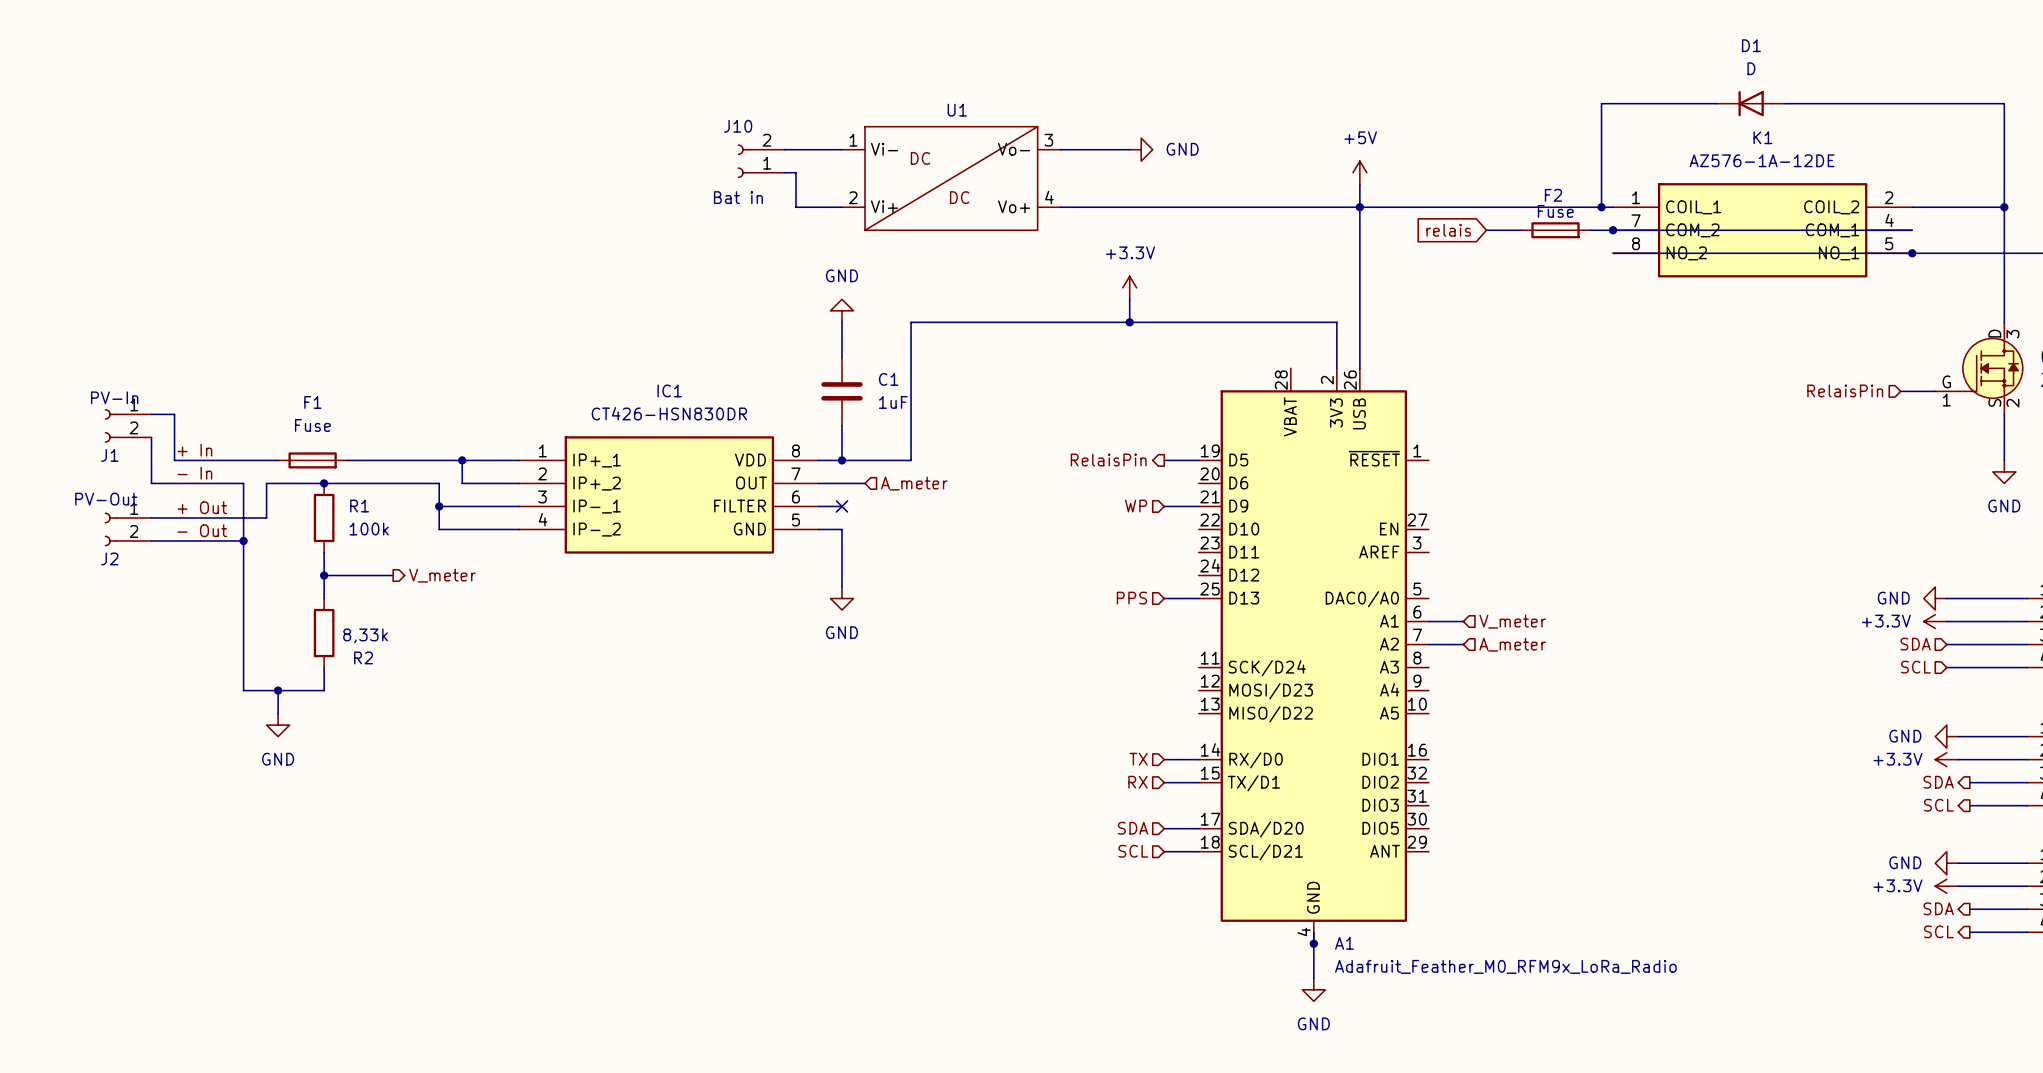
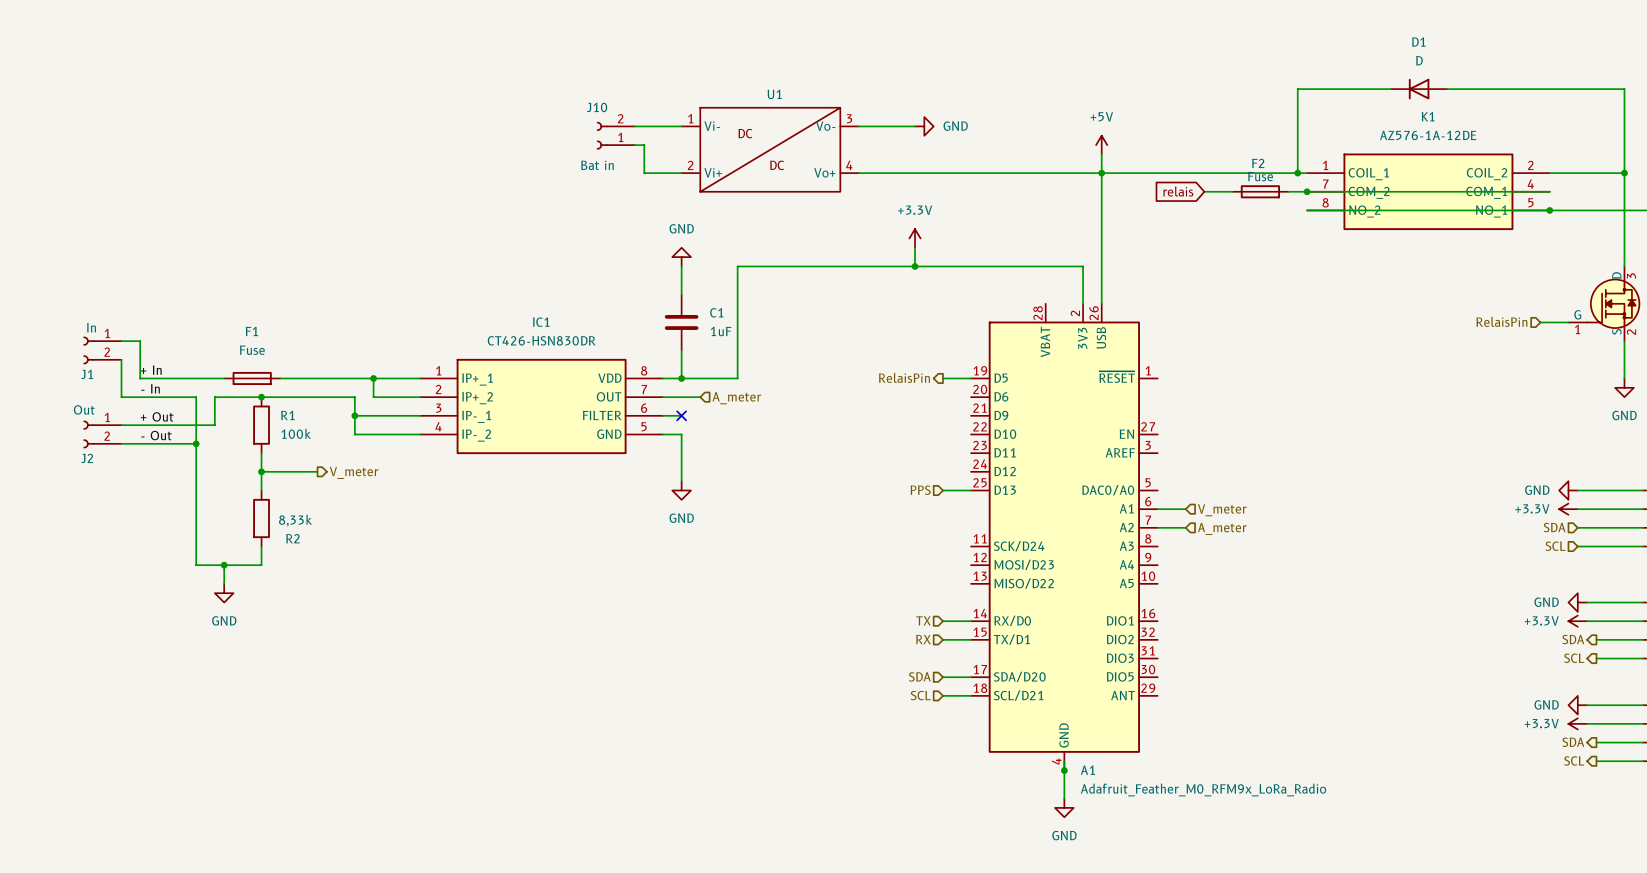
J1 value: PV-In (114, 397) -> In (91, 327)
J2 value: PV-Out (106, 499) -> Out (84, 409)
hierarchical label: WP (1136, 506) -> none
wire: (1164, 506) (1198, 506) -> none

